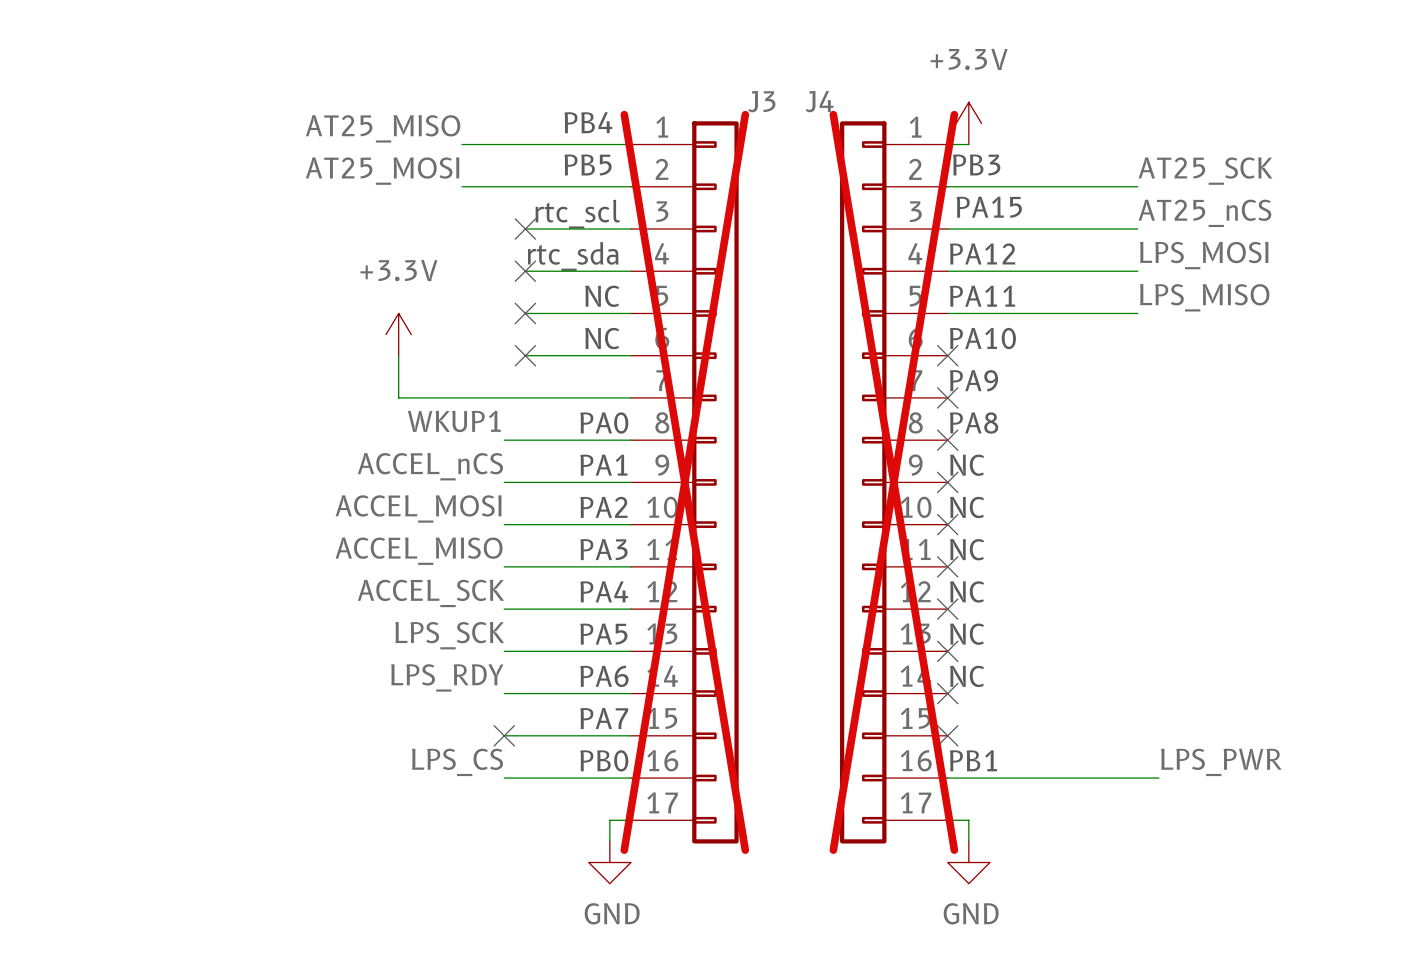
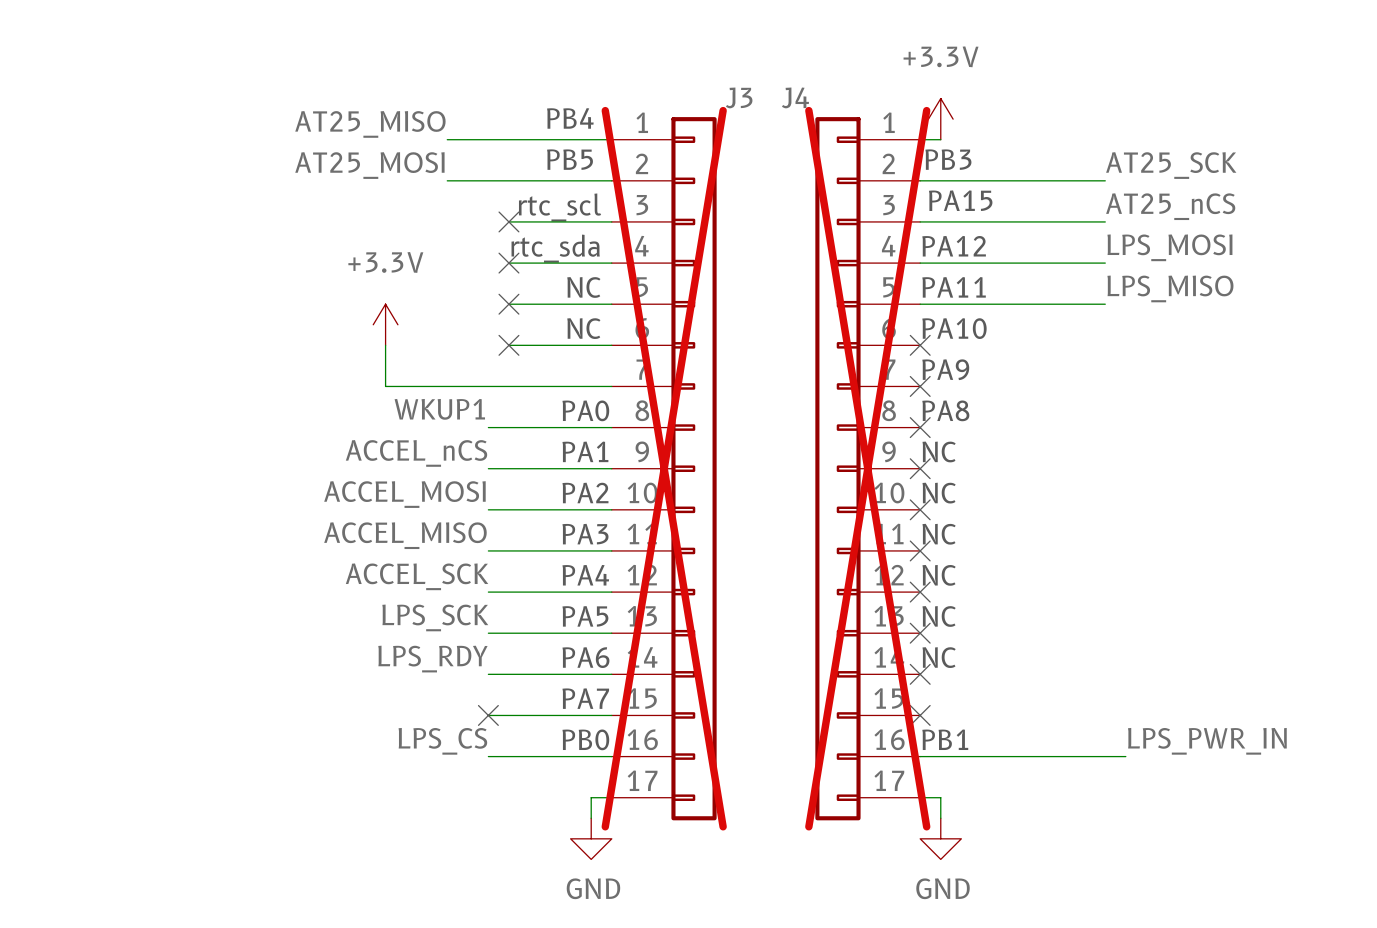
label: LPS_PWR (1221, 762) -> LPS_PWR_IN (1207, 741)

